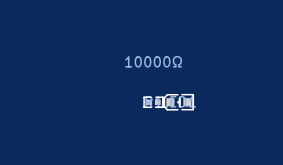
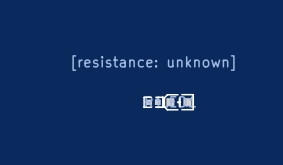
part value: 10000Ω (153, 61) -> [resistance: unknown] (153, 63)

